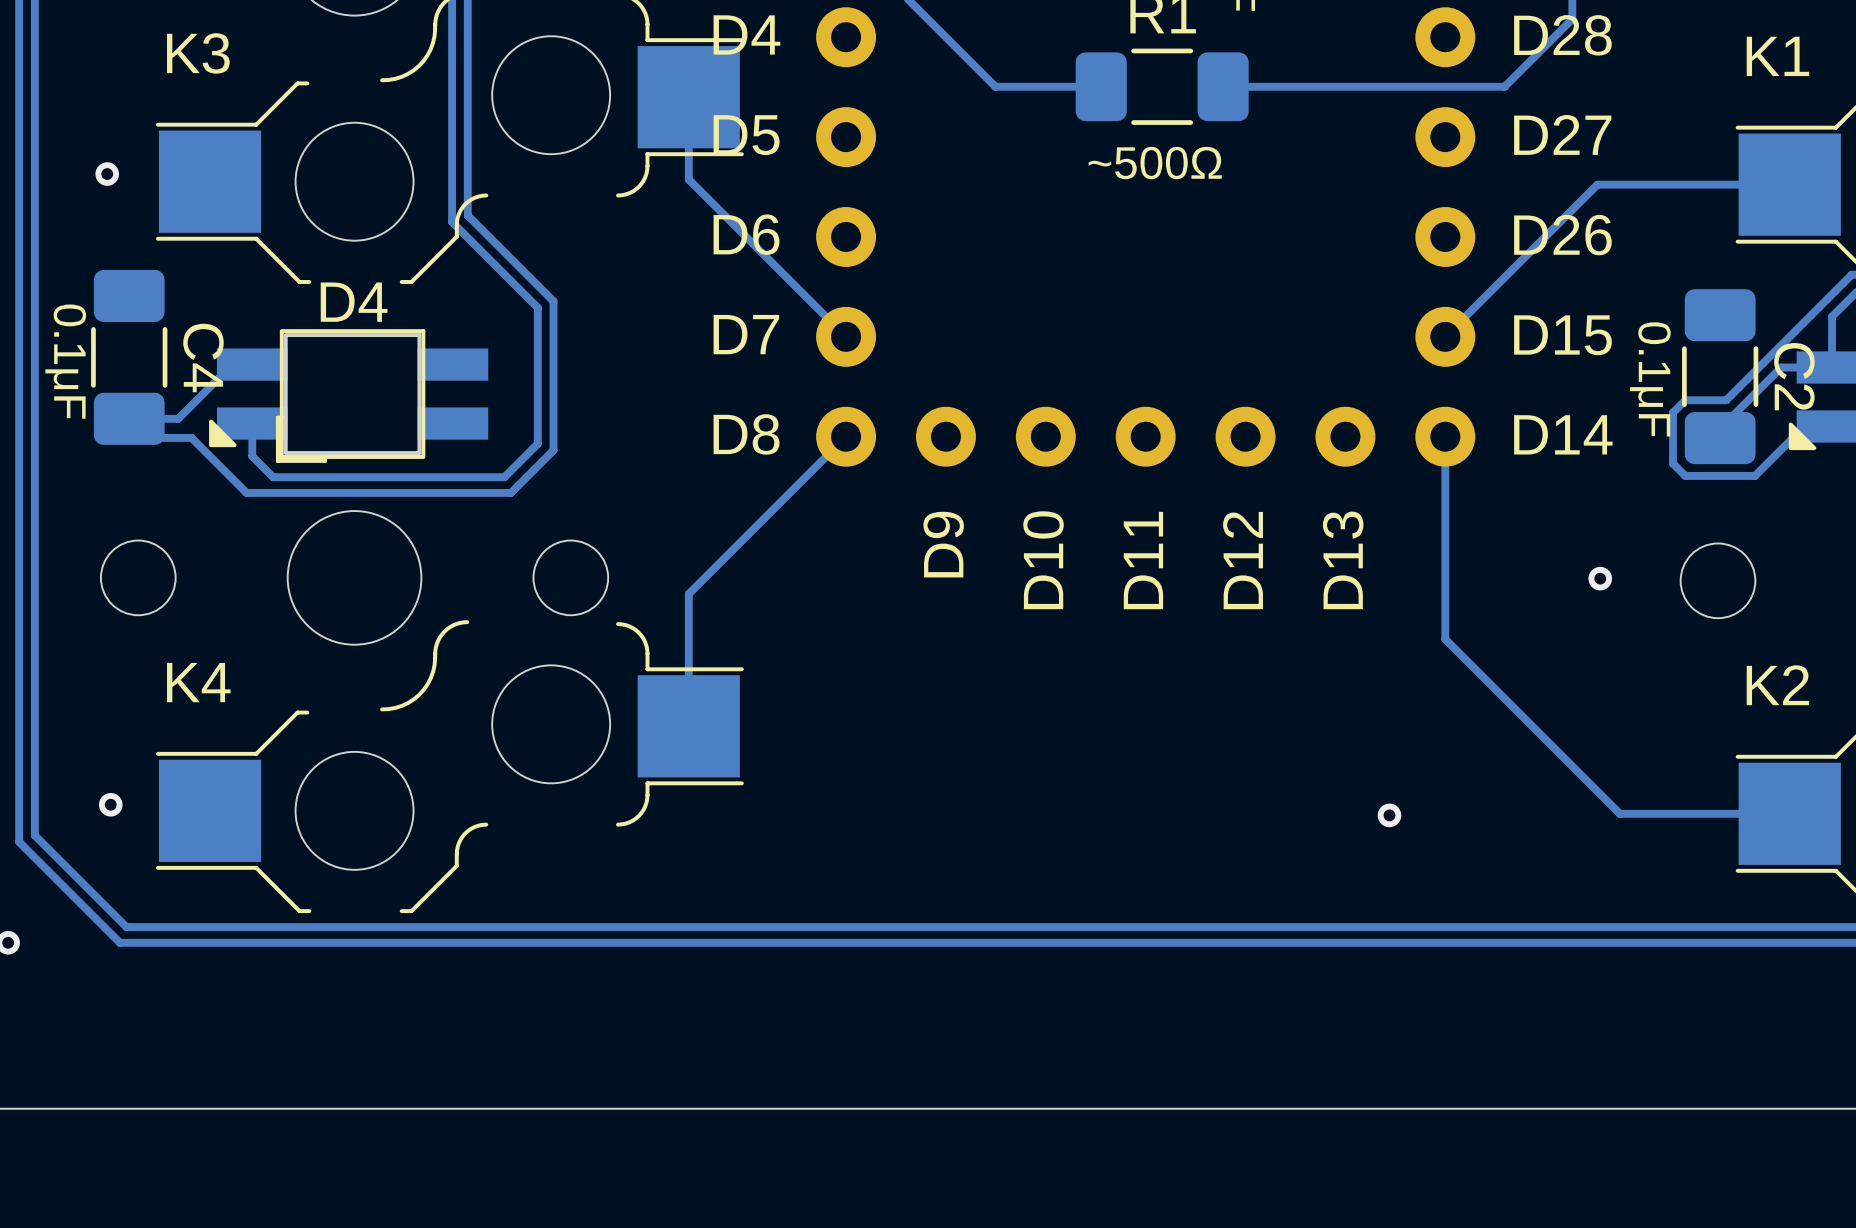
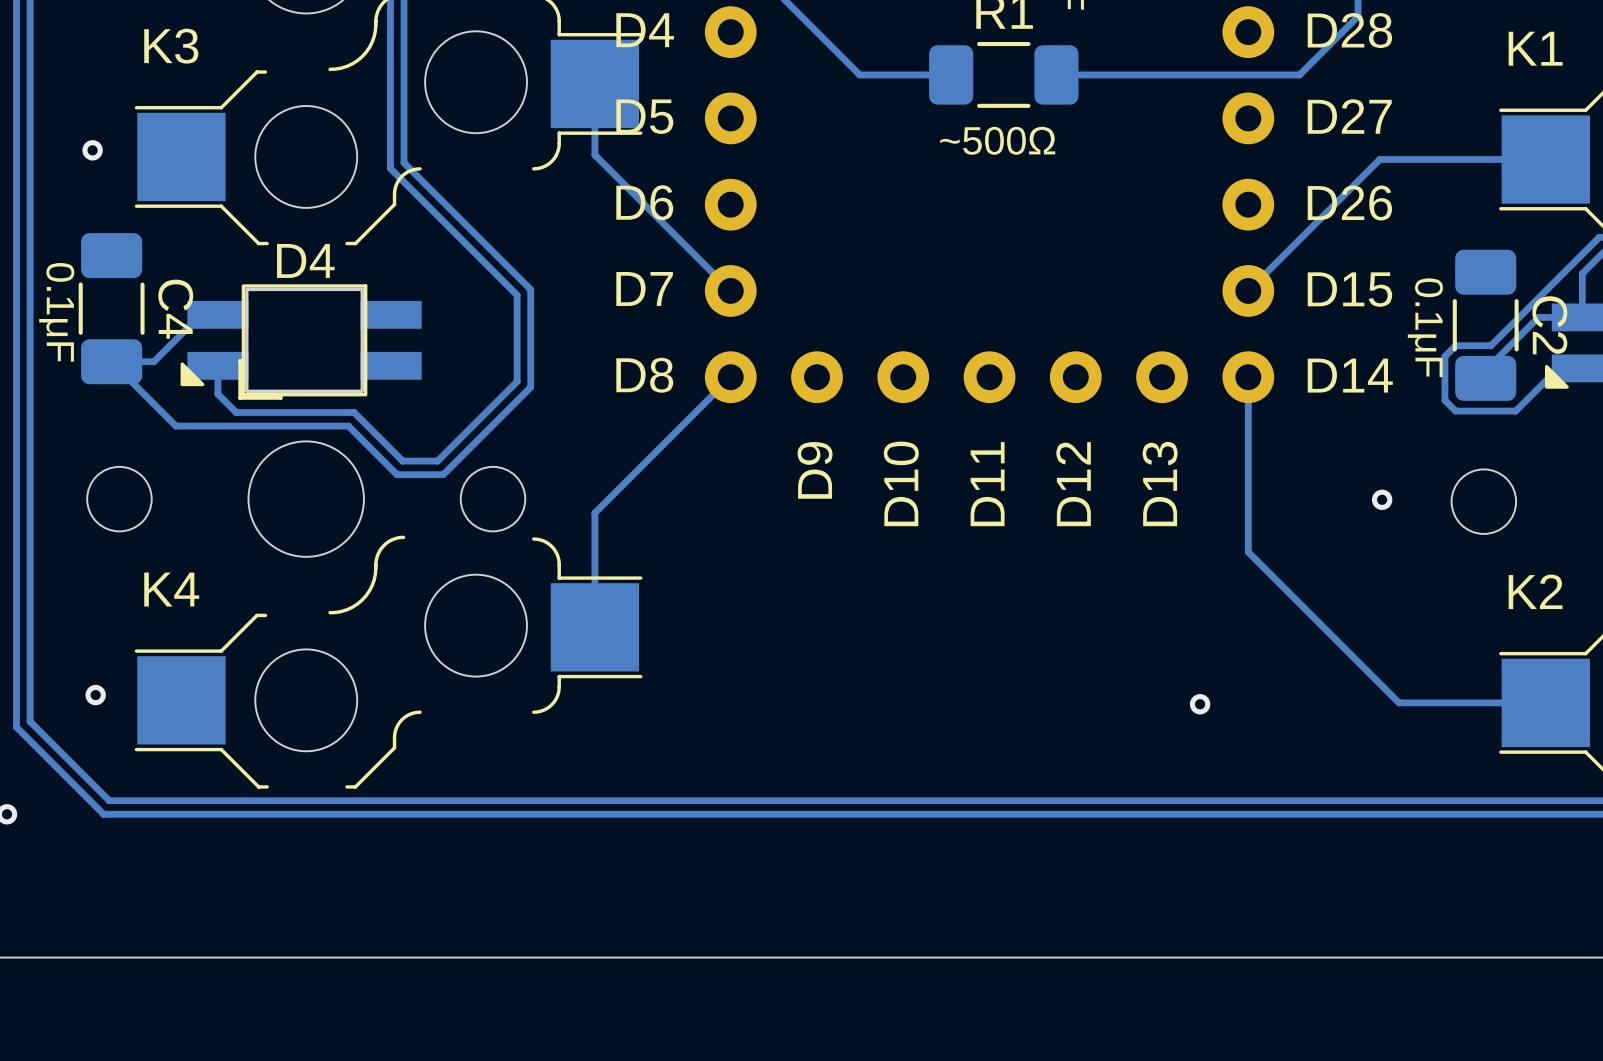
track: (467, 188) (467, 215) (553, 301) (553, 450) (510, 492) (246, 492) (191, 437) (148, 437) -> (404, 162) (530, 289) (530, 387) (443, 474) (397, 474) (348, 426) (175, 426) (128, 378)
track: (452, 195) (452, 222) (537, 307) (537, 443) (504, 477) (273, 477) -> (390, 168) (517, 295) (517, 381) (437, 461) (402, 461) (354, 412) (236, 412)

